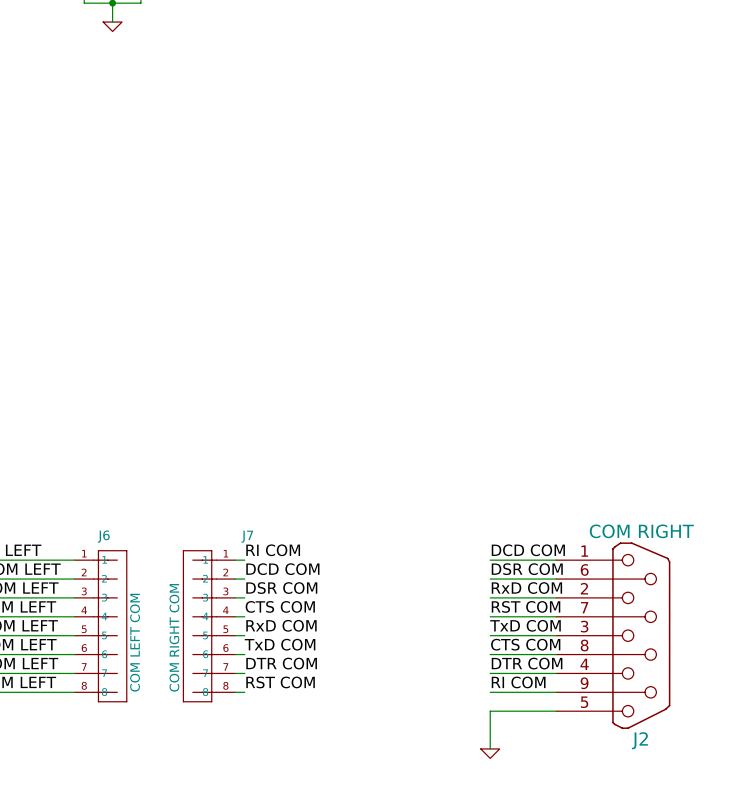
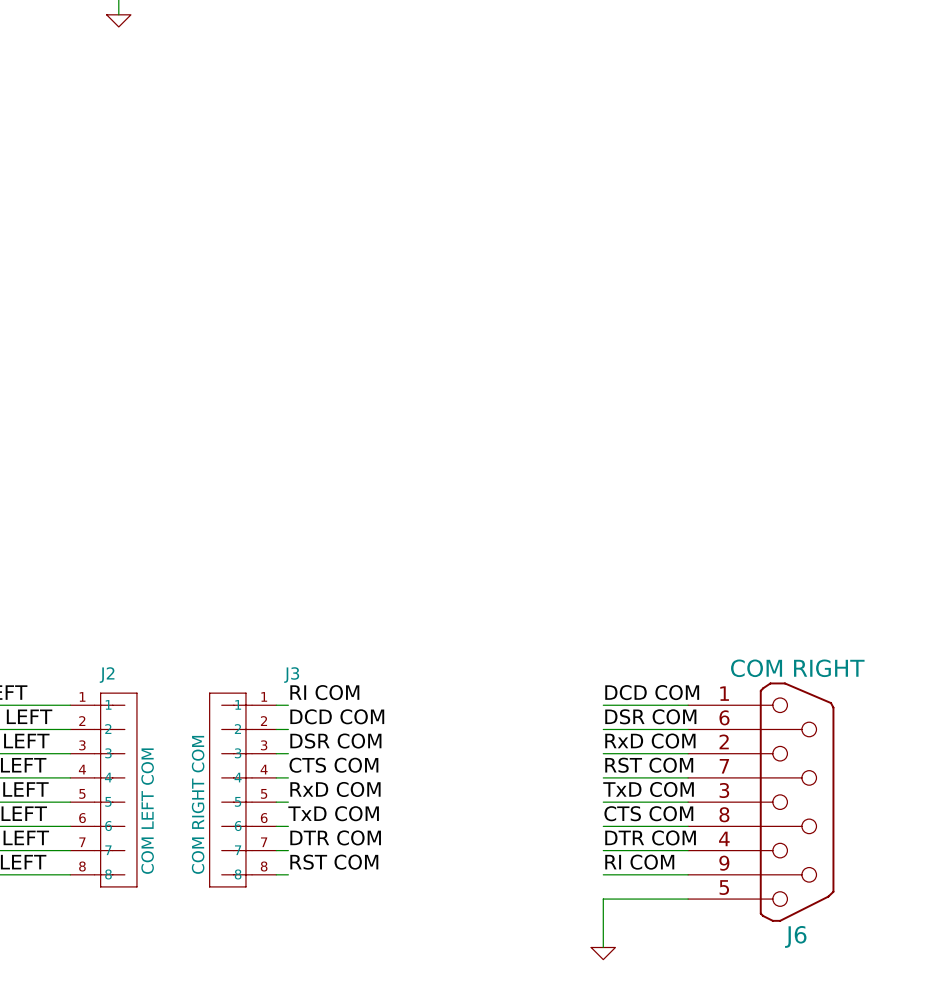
J6 name: J6 (103, 536) -> J2 (107, 675)
J7 name: J7 (247, 536) -> J3 (291, 675)
J2 name: J2 (639, 740) -> J6 (795, 936)

